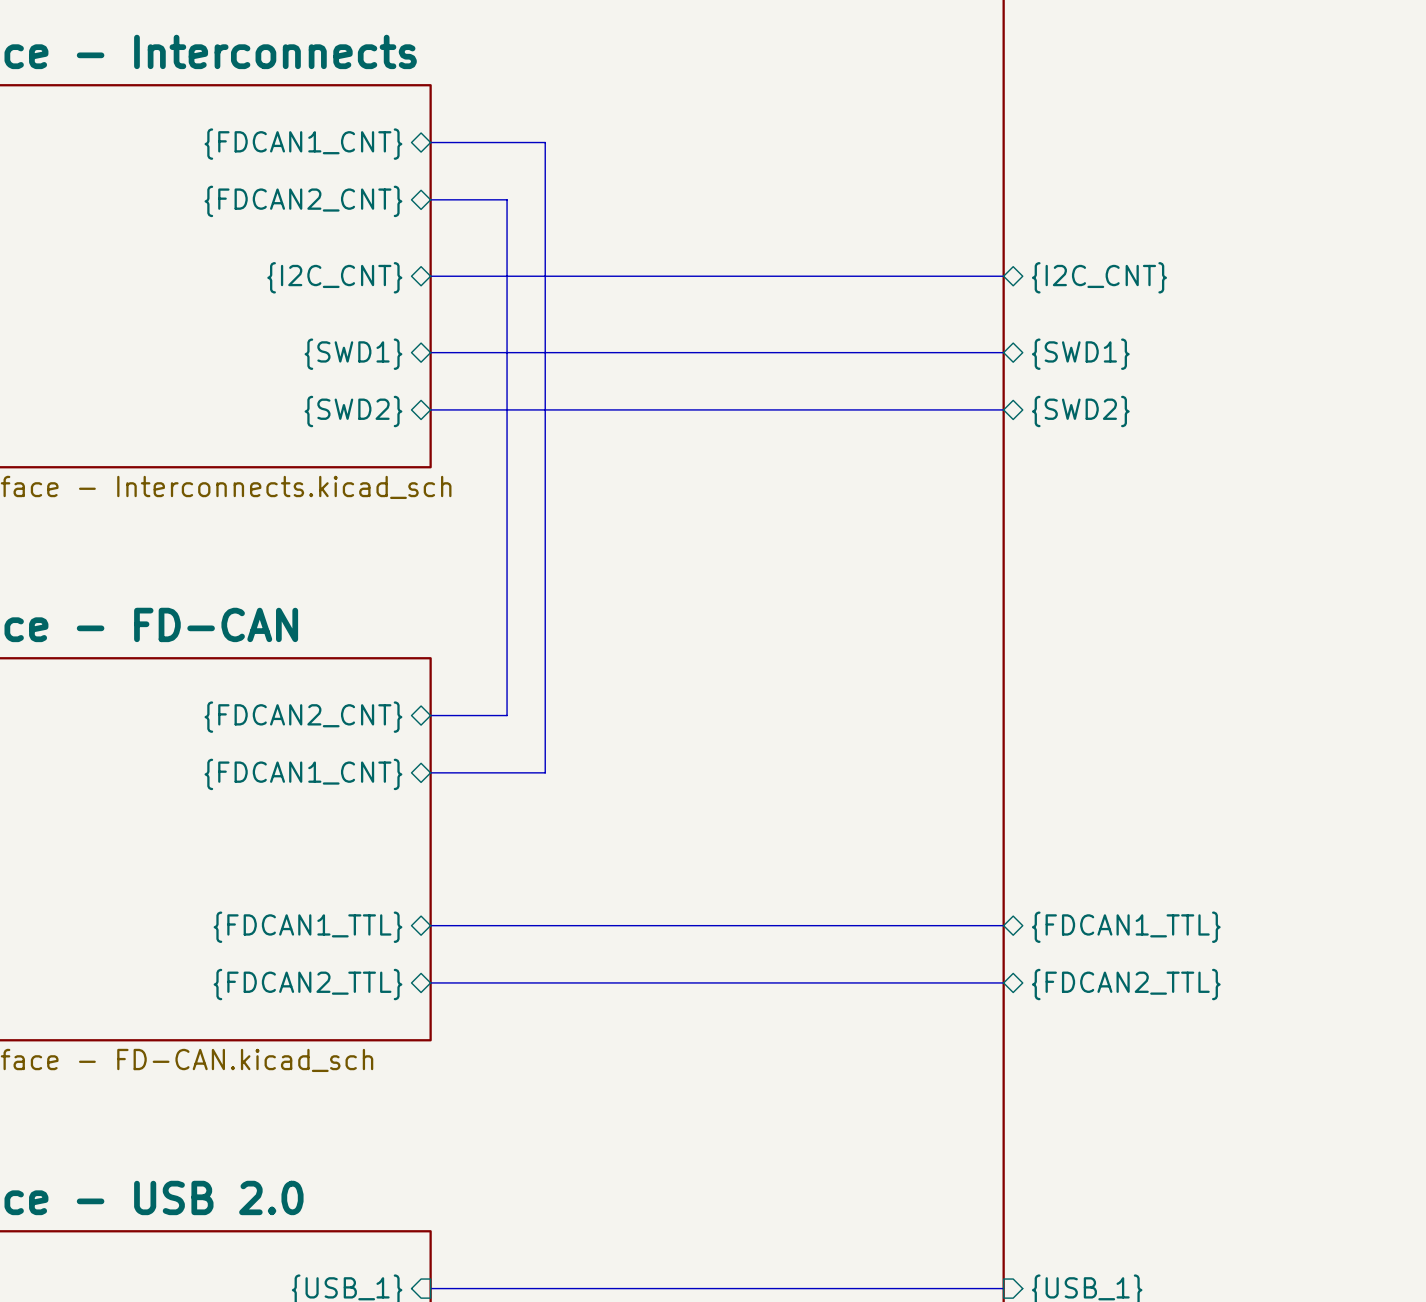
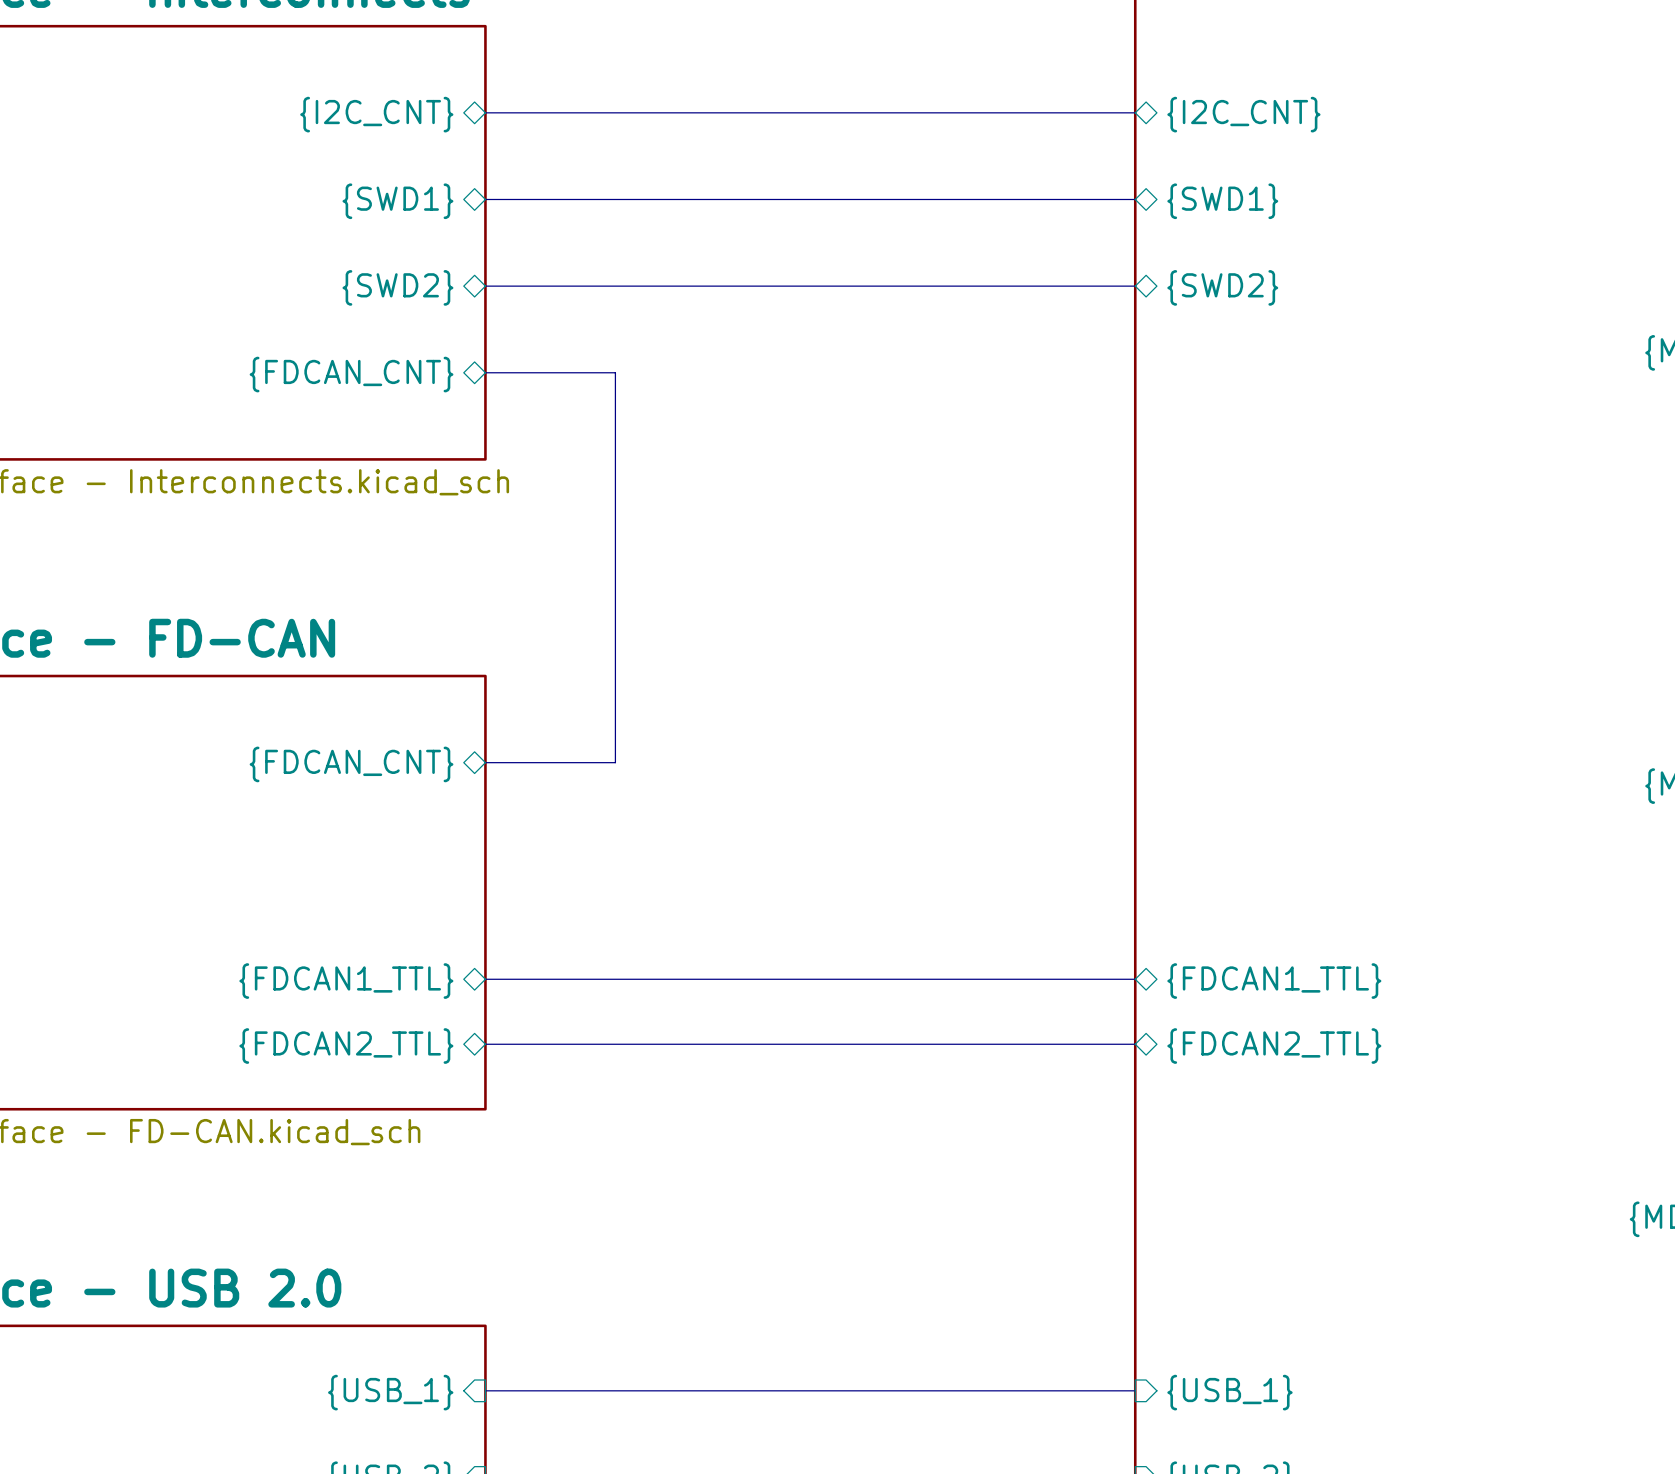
bus: (430, 142) (545, 142) (545, 390) -> (485, 372) (615, 372)
sheet pin: {FDCAN1_CNT} (303, 144) -> none
bus: (430, 199) (507, 199) (507, 715) (430, 715) -> none
sheet pin: {FDCAN2_CNT} (303, 201) -> none
bus: (430, 276) (1003, 276) -> (485, 199) (1135, 199)
sheet pin position: {I2C_CNT} (334, 277) -> {I2C_CNT} (376, 114)
sheet pin position: {I2C_CNT} (1099, 277) -> {I2C_CNT} (1243, 114)
bus: (430, 352) (1003, 352) -> (485, 286) (1135, 286)
sheet pin position: {SWD1} (353, 354) -> {SWD1} (397, 201)
sheet pin position: {SWD1} (1080, 354) -> {SWD1} (1222, 201)
sheet pin: none -> {FDCAN_CNT} (351, 374)
bus: (430, 409) (1003, 409) -> (485, 112) (1135, 112)
sheet pin position: {SWD2} (353, 411) -> {SWD2} (397, 287)
sheet pin position: {SWD2} (1080, 411) -> {SWD2} (1222, 287)
sheet pin: {FDCAN2_CNT} (303, 717) -> none
bus: (545, 734) (545, 772) (430, 772) -> (615, 762) (485, 762)
sheet pin: none -> {FDCAN_CNT} (351, 764)
sheet pin: {FDCAN1_CNT} (303, 774) -> none

